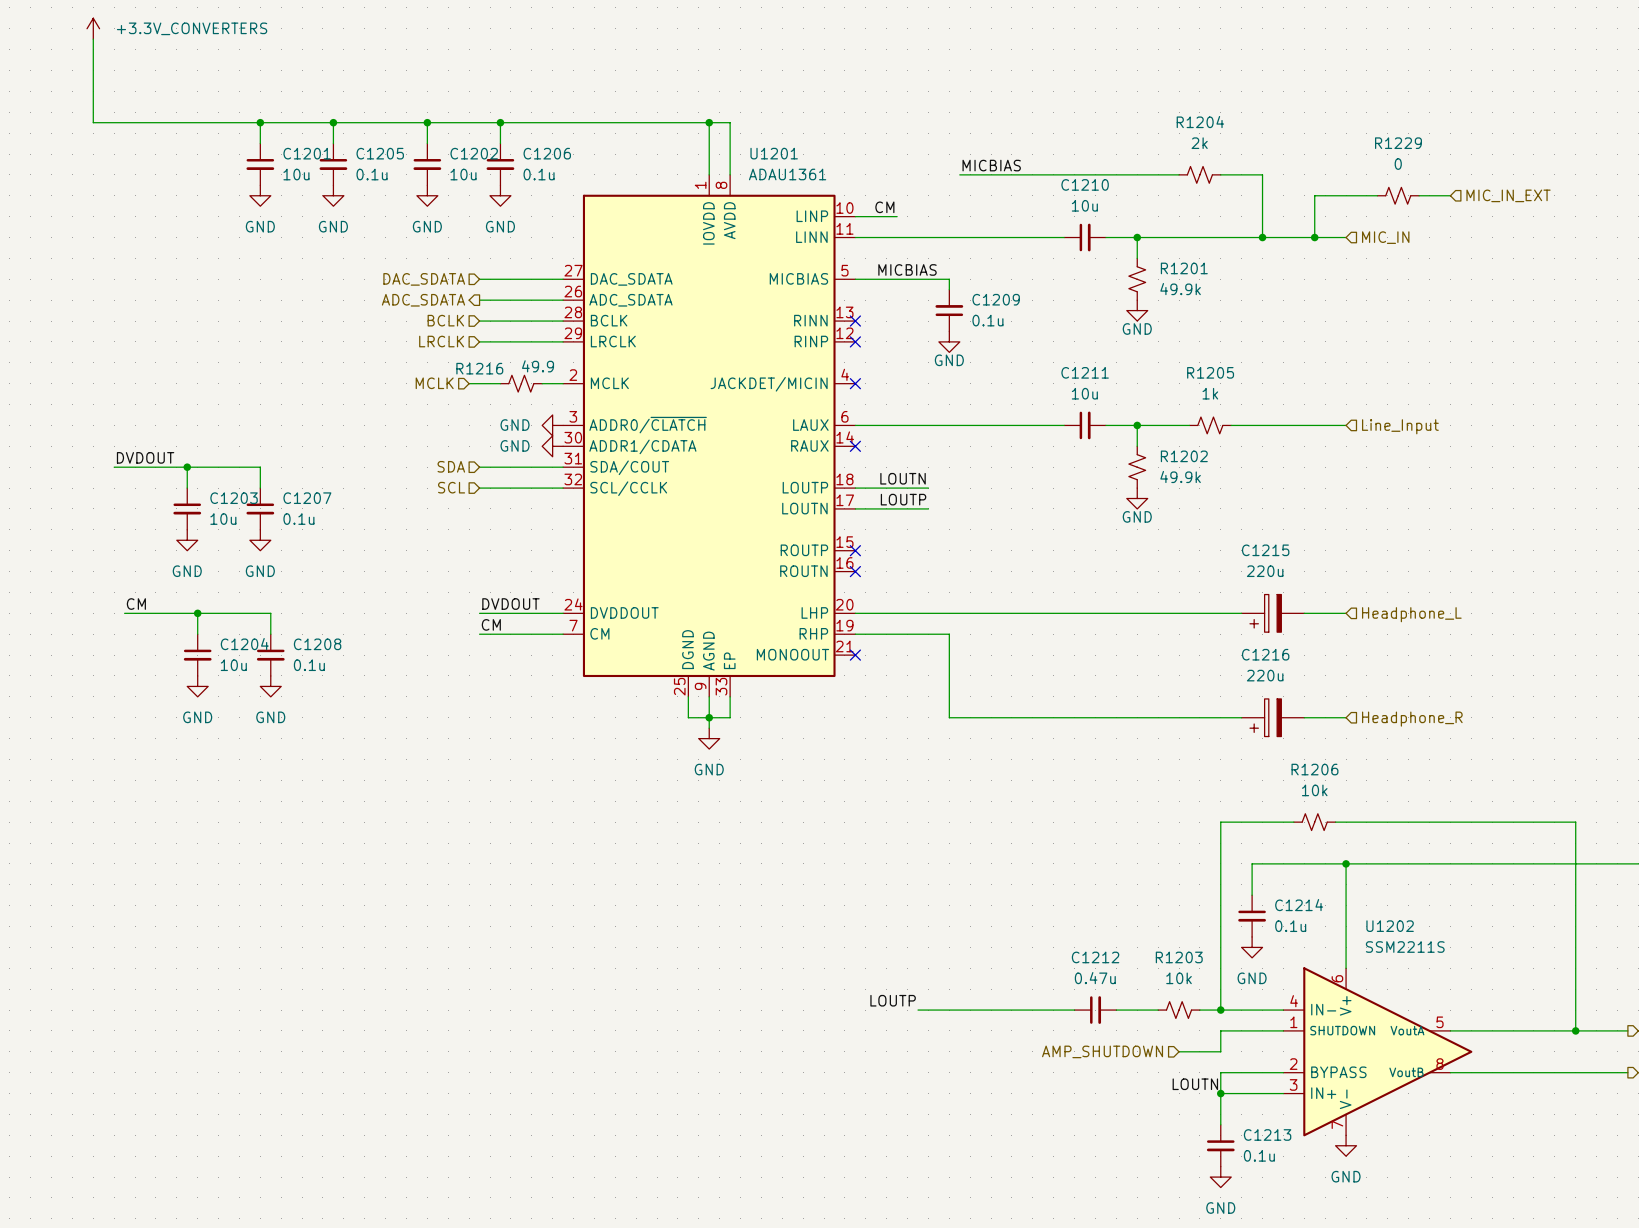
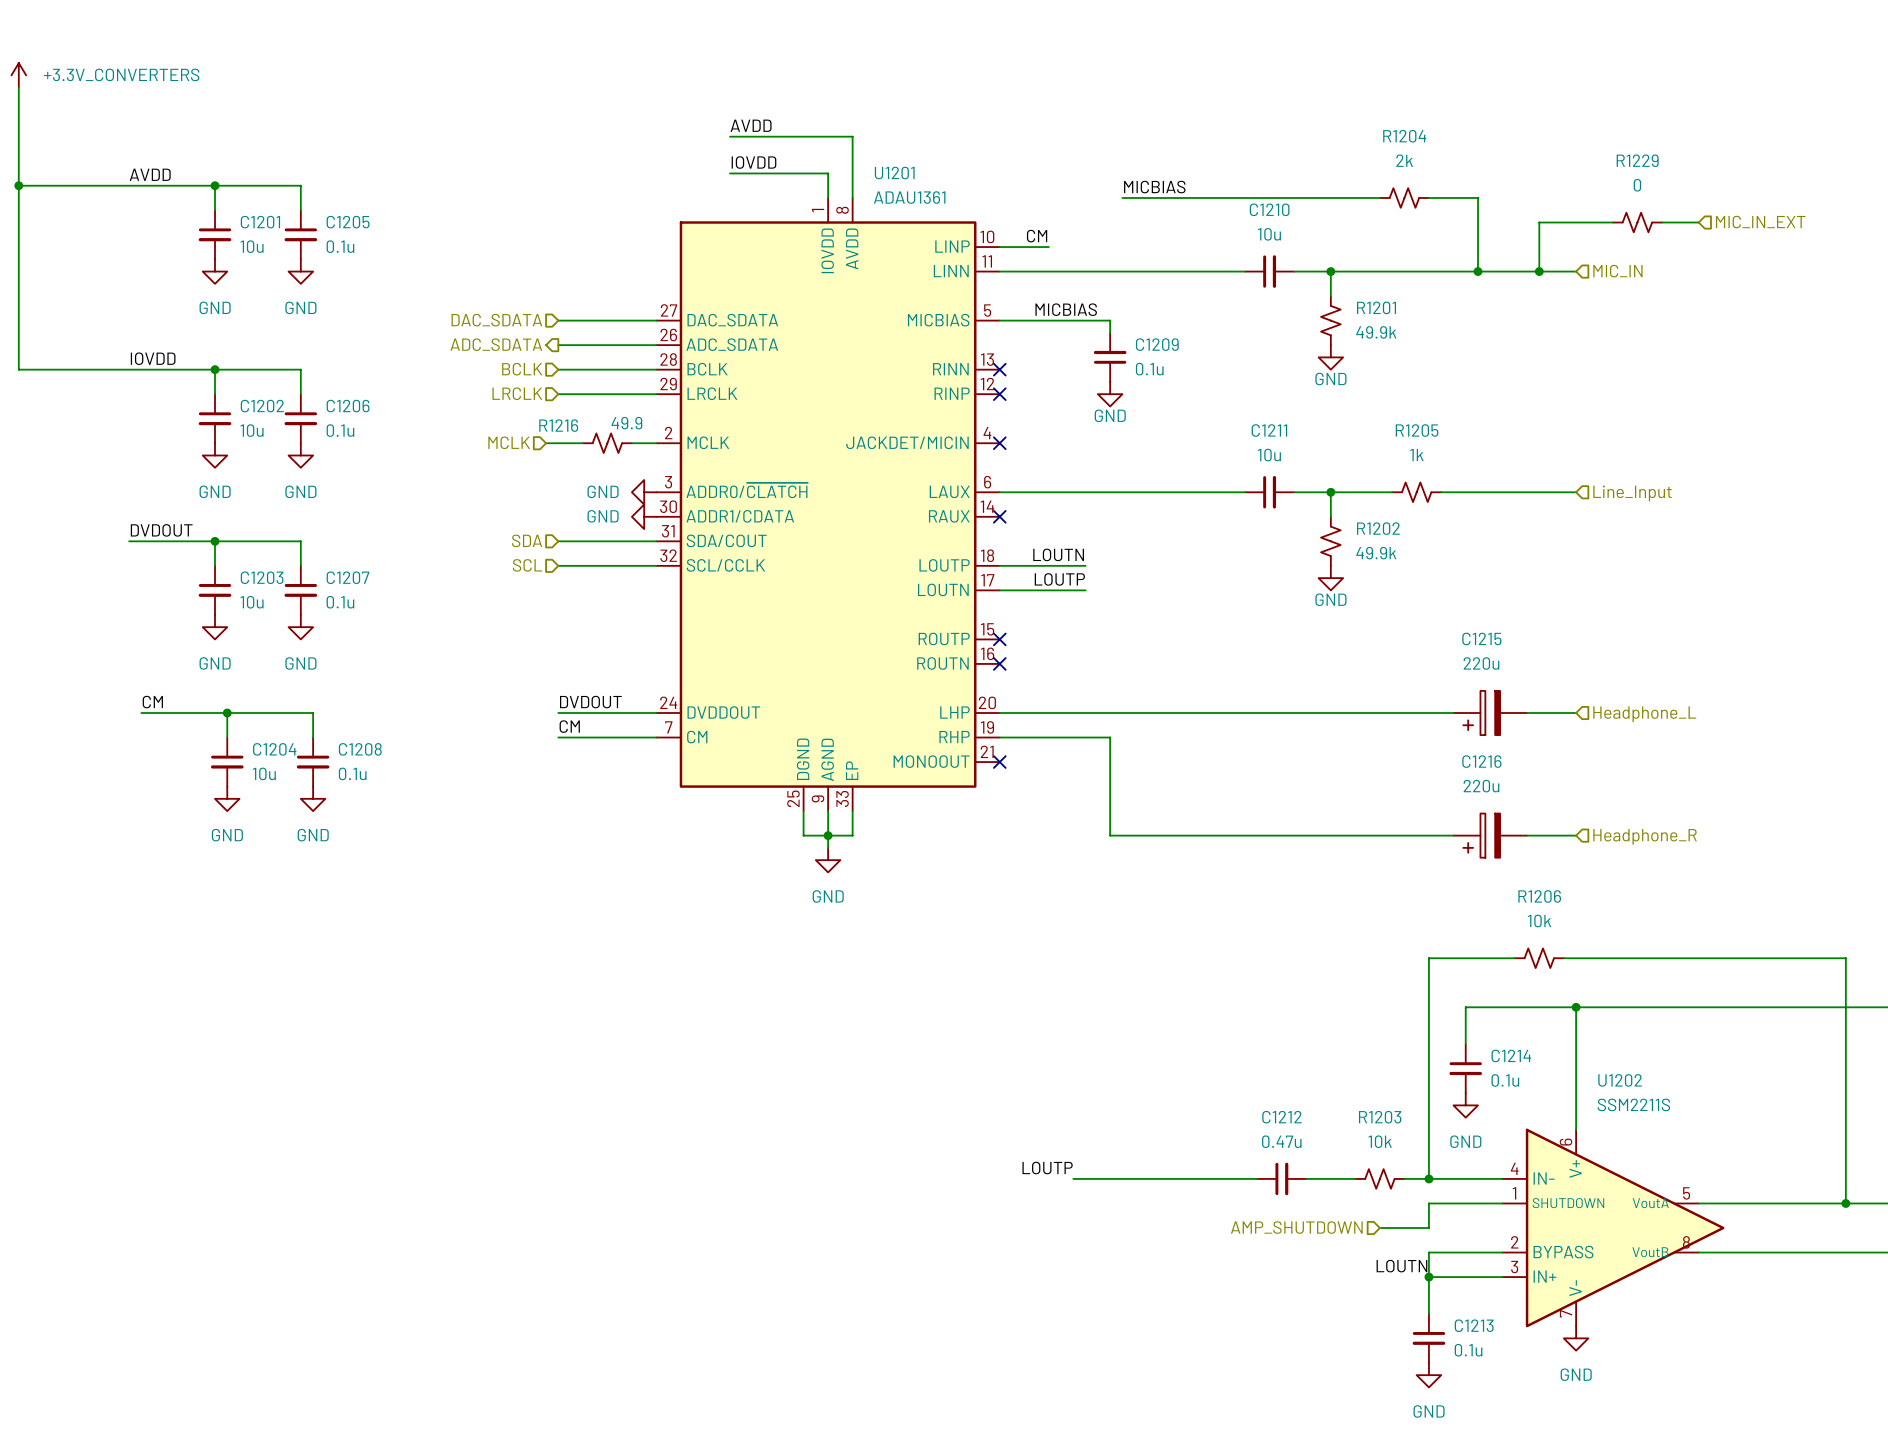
power symbol position: +3.3V_CONVERTERS (93, 28) -> +3.3V_CONVERTERS (18, 75)
wire: (93, 39) (93, 122) (625, 122) -> none
wire: none -> (18, 87) (18, 369) (300, 369) (300, 394)
label: none -> AVDD (751, 125)
wire: (260, 122) (260, 143) -> (215, 185) (215, 210)
junction: (260, 122) -> none
wire: (333, 122) (333, 143) -> none
junction: (333, 122) -> none
wire: (427, 122) (427, 143) -> none
junction: (427, 122) -> none
wire: (500, 122) (500, 143) -> none
junction: (500, 122) -> none
wire: (709, 122) (709, 154) -> (730, 173) (828, 173)
junction: (709, 122) -> none
label: none -> IOVDD (753, 162)
label: none -> AVDD (150, 174)
wire: none -> (18, 185) (300, 185) (300, 210)
junction: none -> (18, 185)
junction: none -> (215, 185)
C1201 position: (260, 164) -> (215, 234)
C1205 position: (333, 164) -> (300, 234)
C1202 position: (427, 164) -> (215, 418)
C1206 position: (500, 164) -> (300, 418)
power symbol position: GND (260, 195) -> GND (300, 271)
power symbol: GND (333, 195) -> none
power symbol: GND (427, 195) -> none
power symbol: GND (500, 195) -> none
power symbol: none -> GND (215, 271)
label: none -> IOVDD (153, 358)
wire: none -> (215, 369) (215, 394)
junction: none -> (215, 369)
power symbol: none -> GND (215, 455)
power symbol: none -> GND (300, 455)

